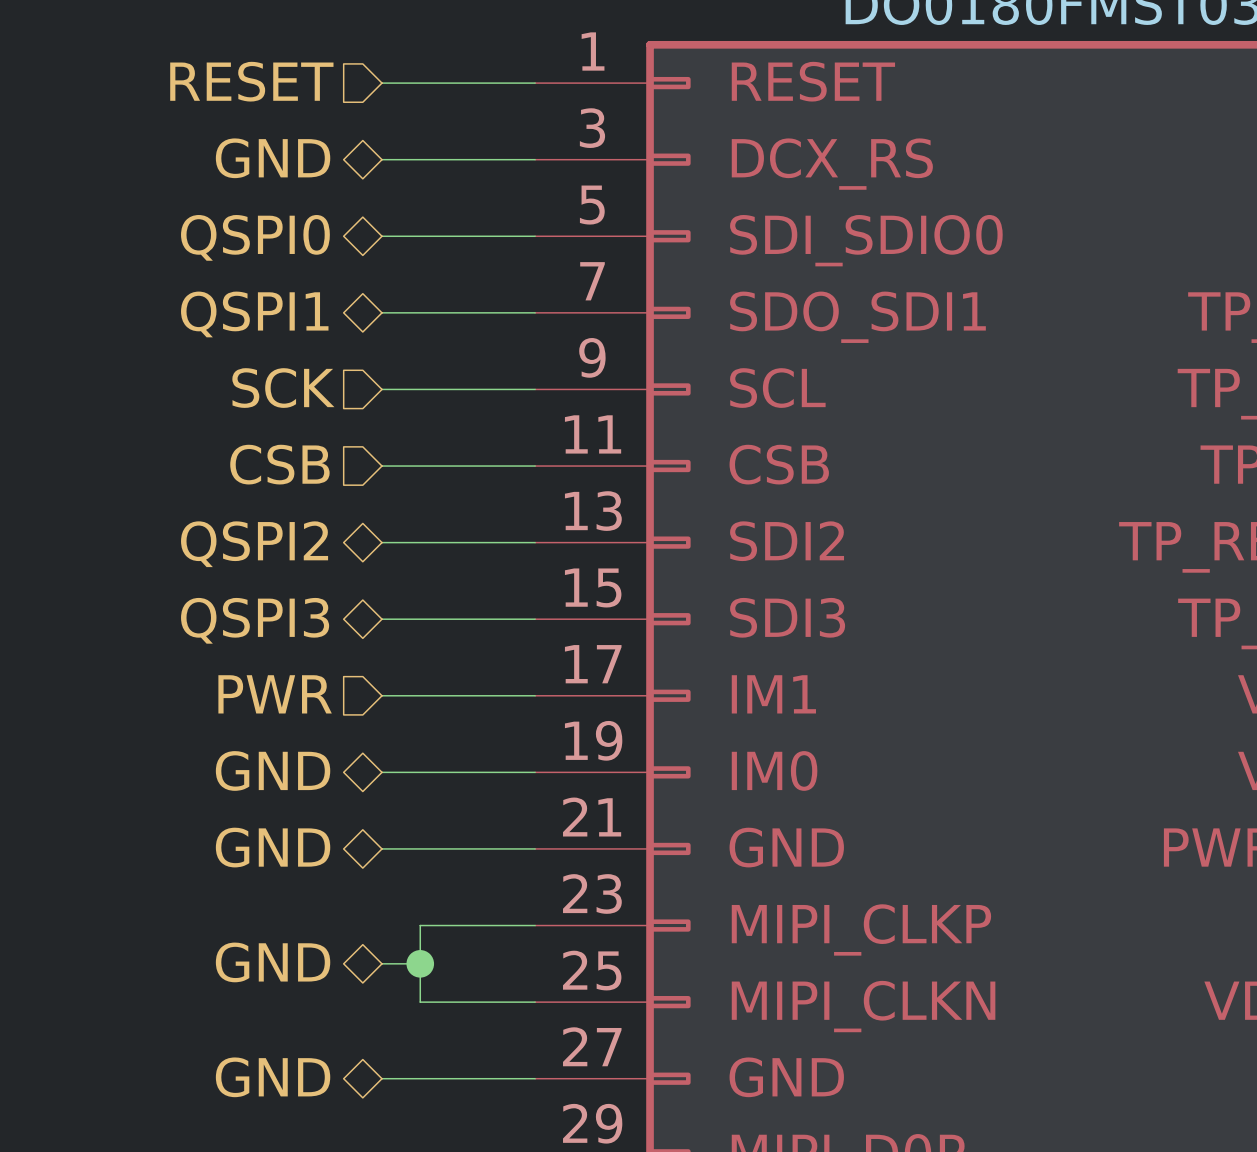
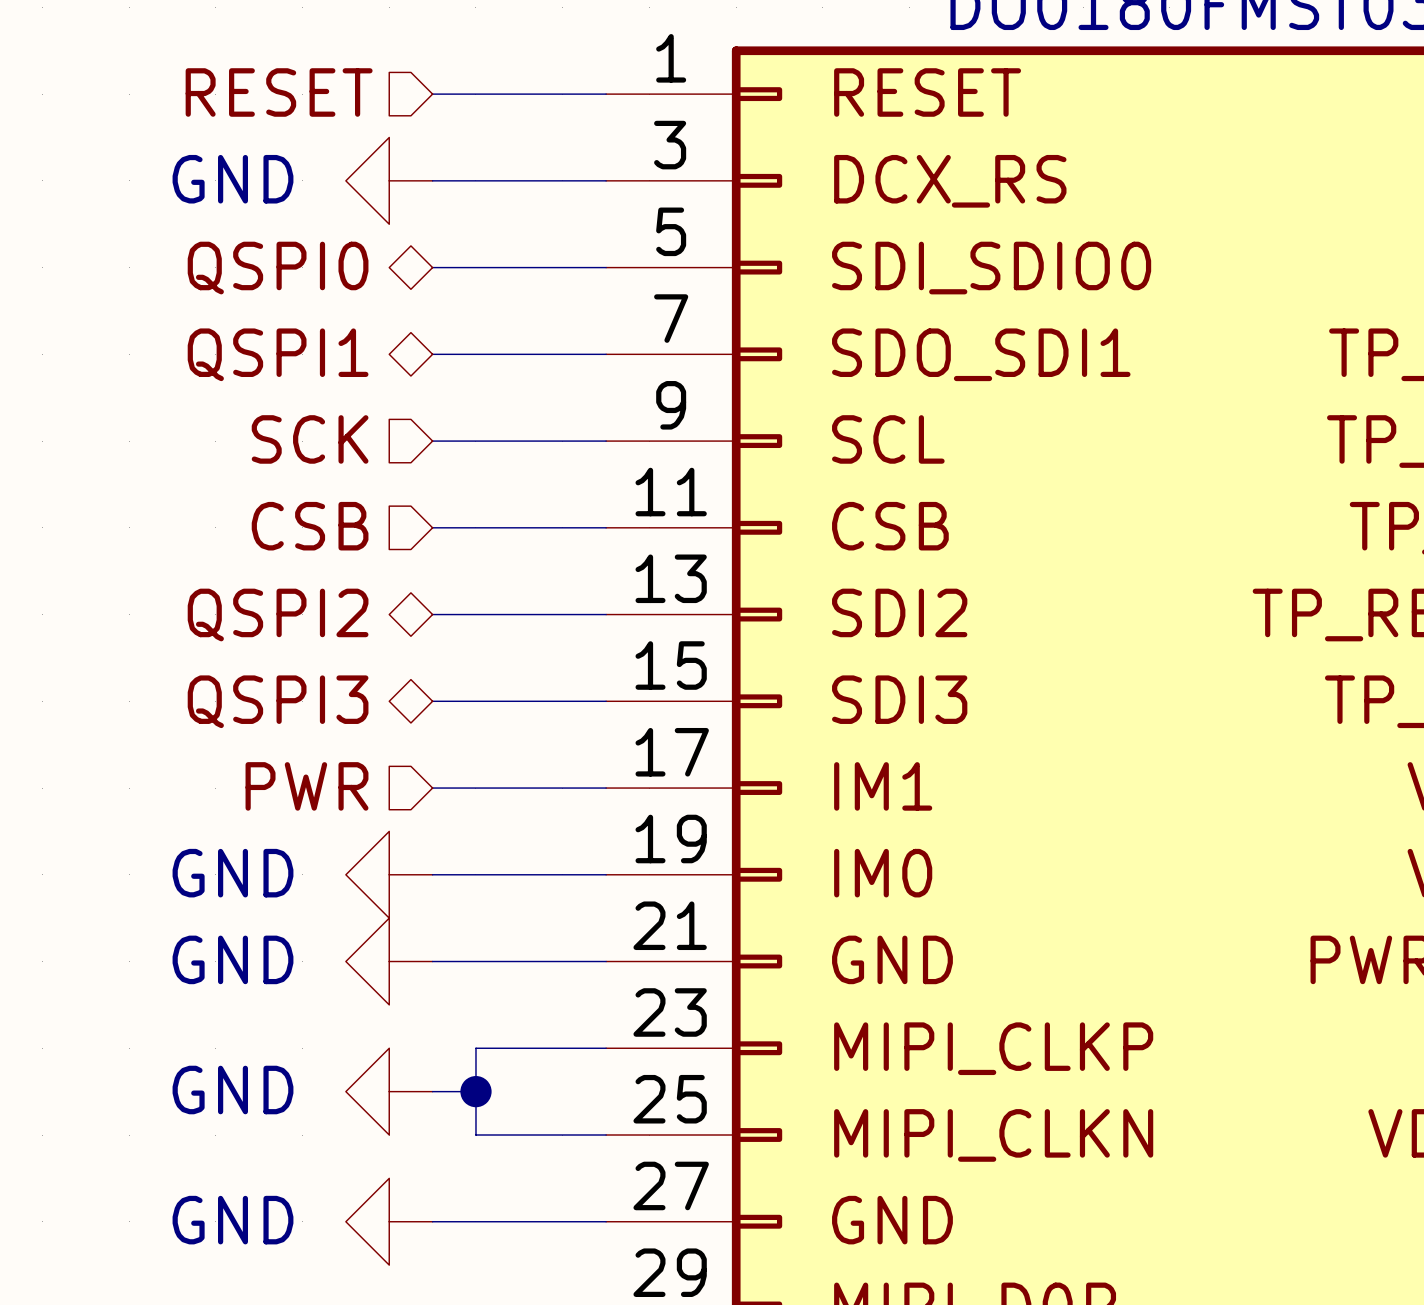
hierarchical label: GND (273, 158) -> none
power symbol: none -> GND (389, 180)
hierarchical label: GND (273, 770) -> none
power symbol: none -> GND (389, 874)
hierarchical label: GND (273, 847) -> none
power symbol: none -> GND (389, 961)
hierarchical label: GND (273, 962) -> none
power symbol: none -> GND (389, 1091)
hierarchical label: GND (273, 1077) -> none
power symbol: none -> GND (389, 1221)

